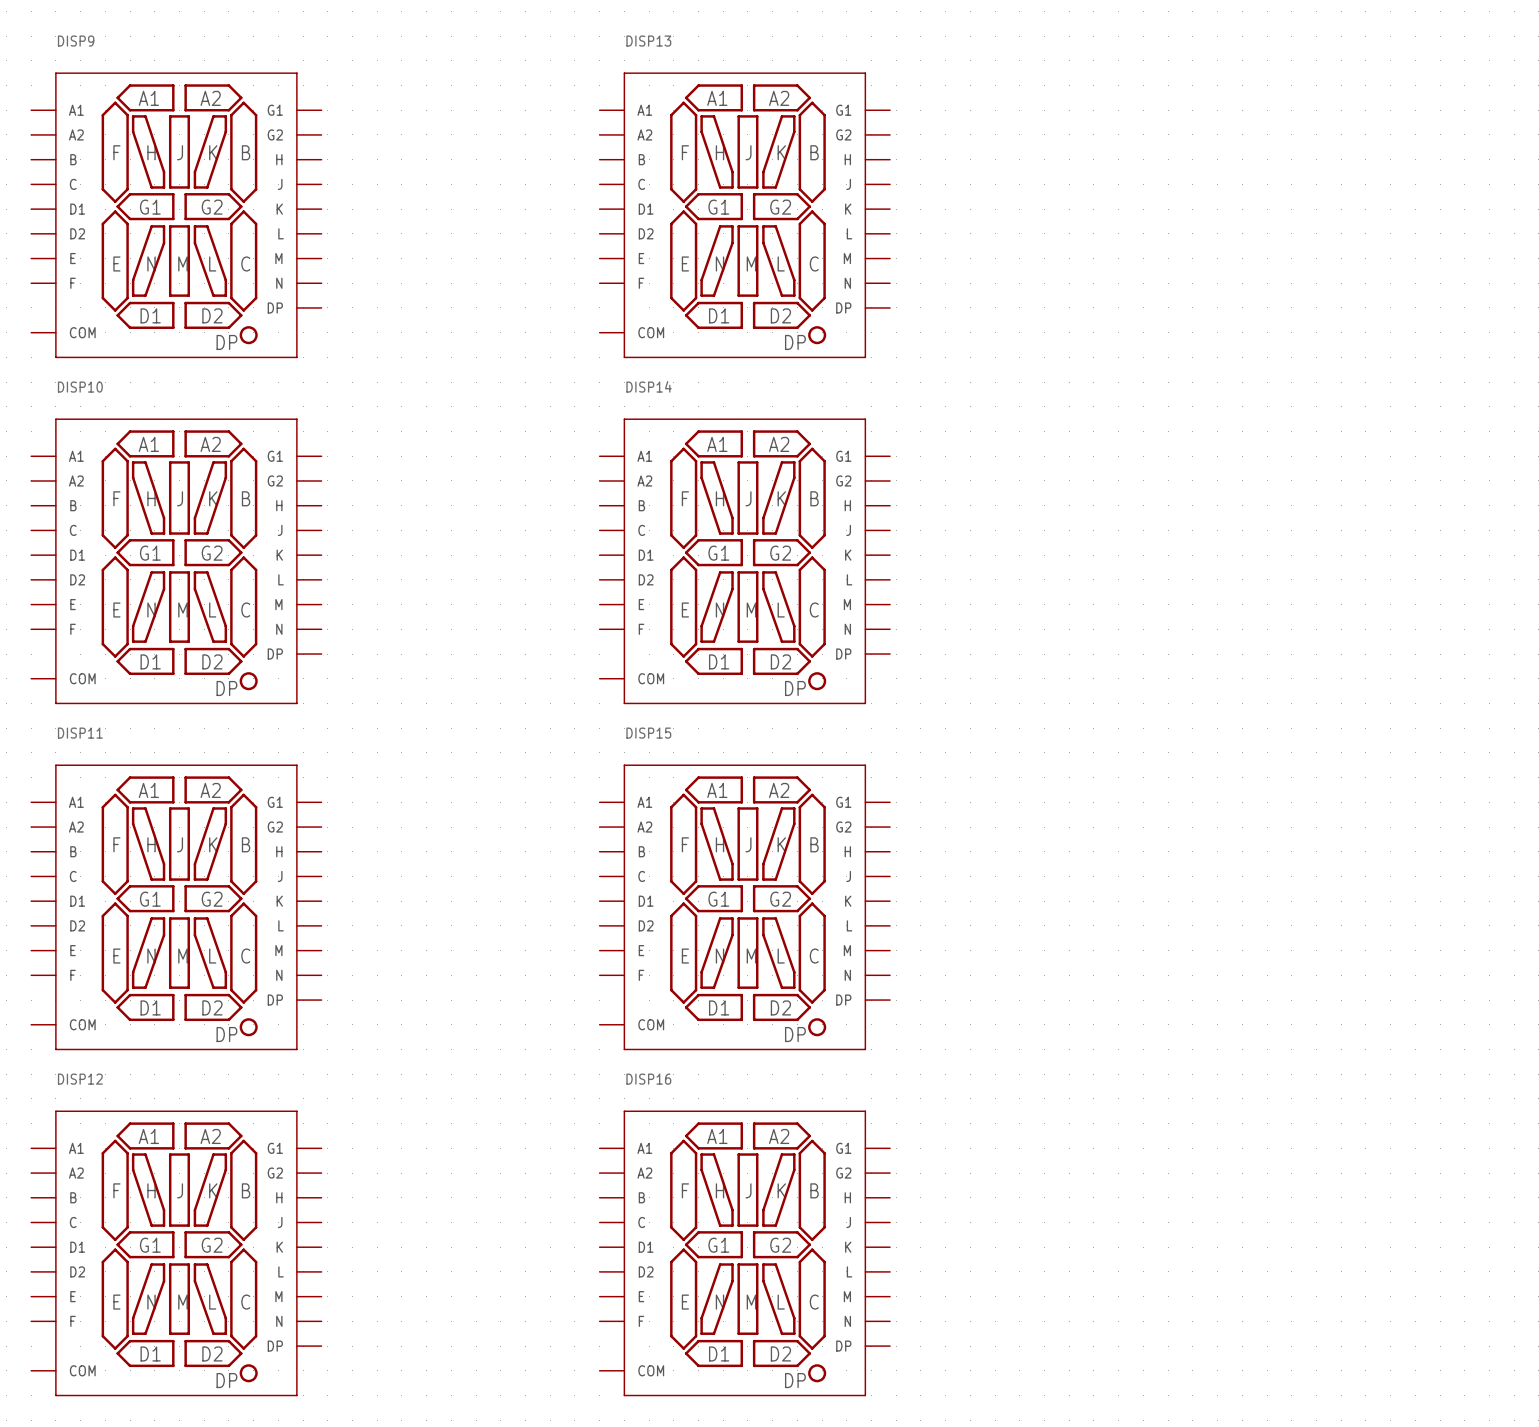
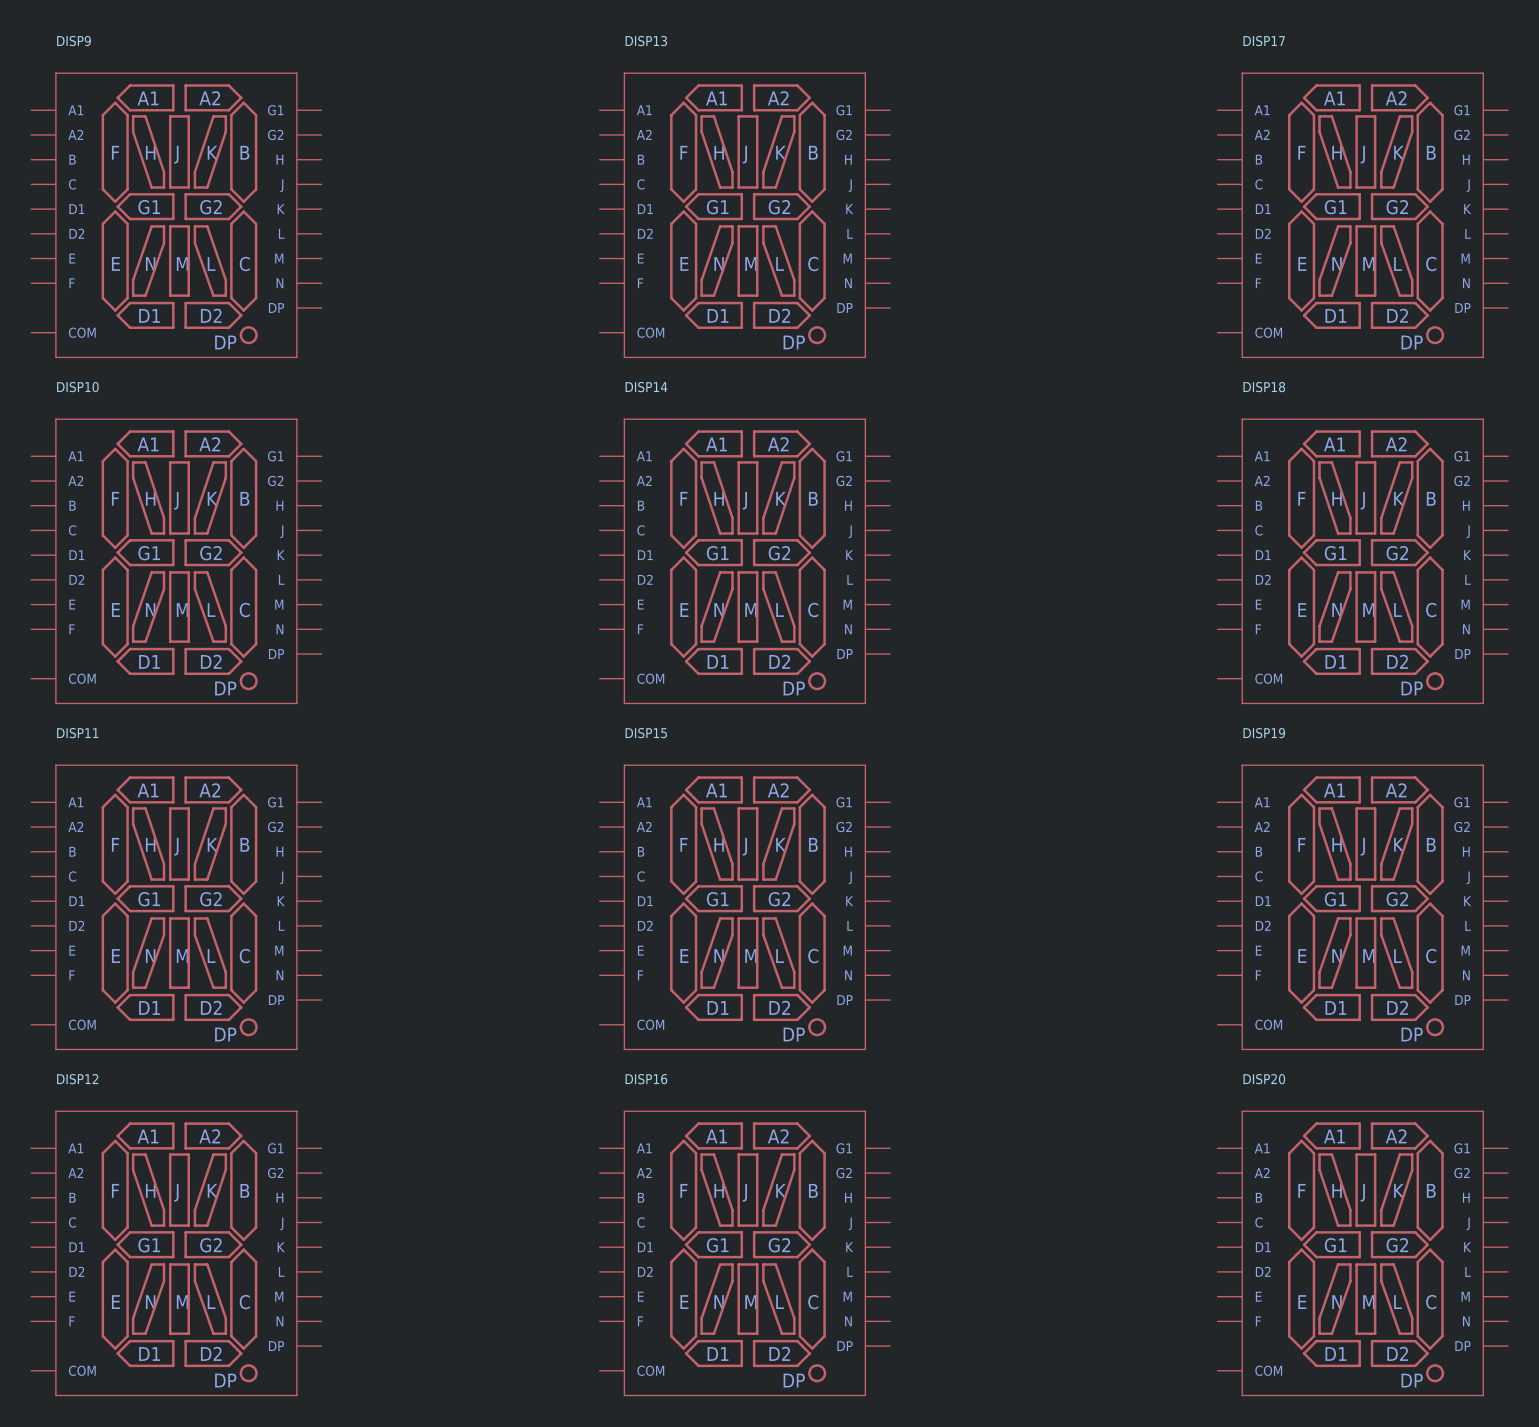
DISP17: none -> (1362, 215)
DISP18: none -> (1362, 561)
DISP19: none -> (1362, 907)
DISP20: none -> (1362, 1253)

